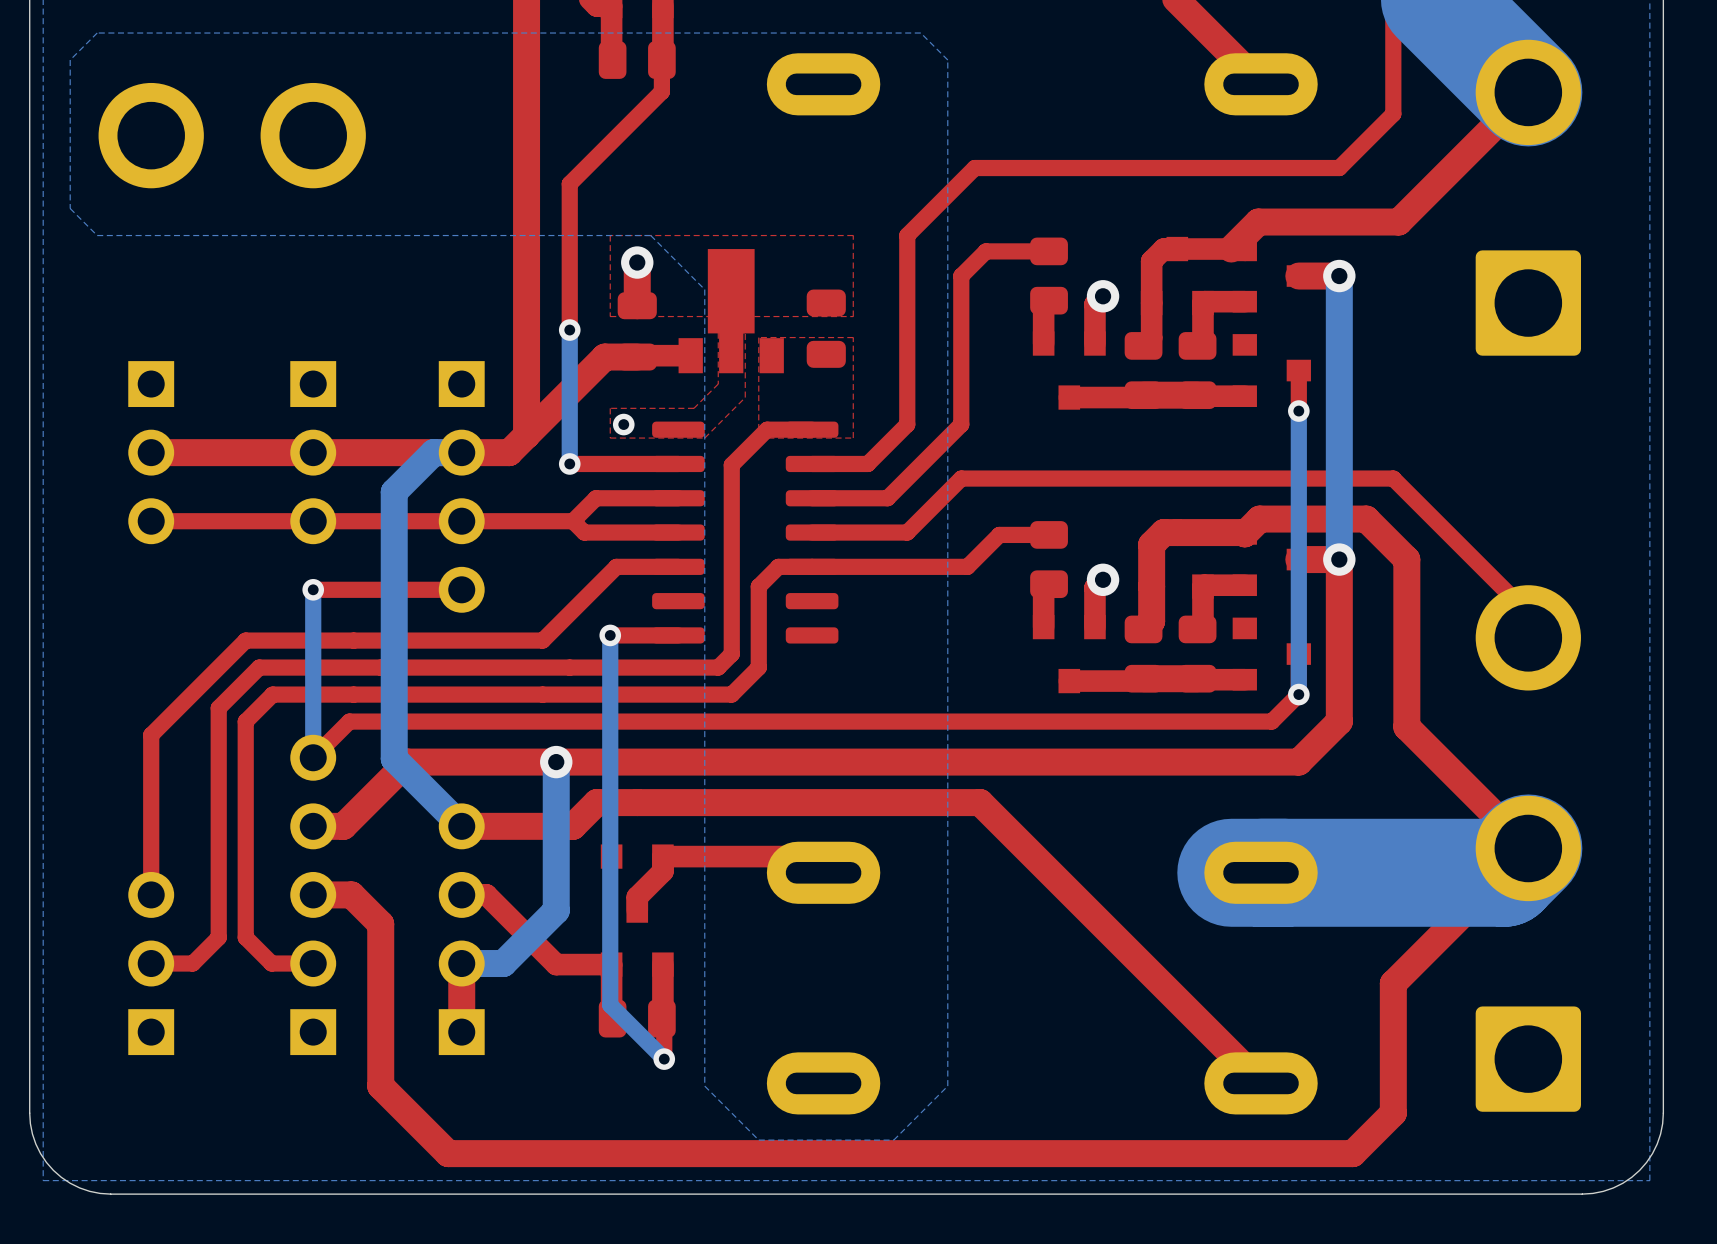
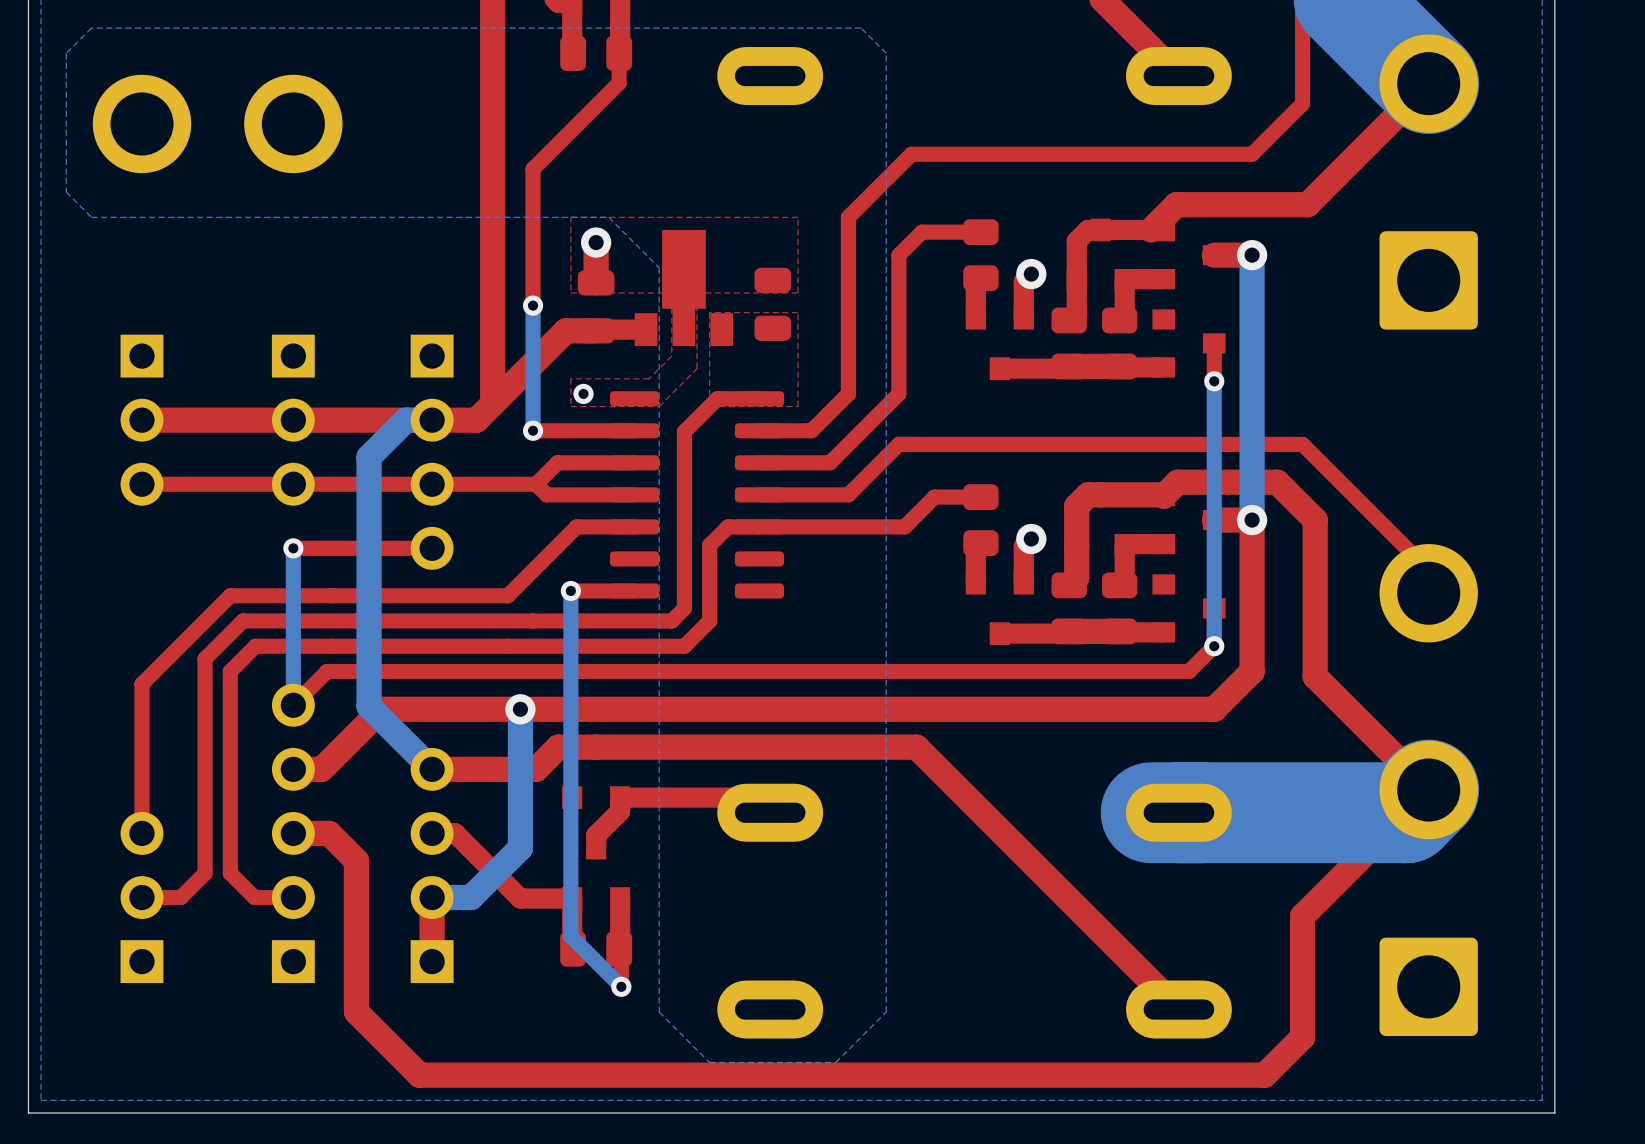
board edge: (29, 1113) (35, 1144) (53, 1170) (79, 1187) (110, 1194) -> (28, 1037) (28, 1112) (104, 1112)
board edge: (1663, 1113) (1657, 1144) (1639, 1170) (1613, 1187) (1582, 1194) -> (1554, 1037) (1554, 1112) (1479, 1112)

